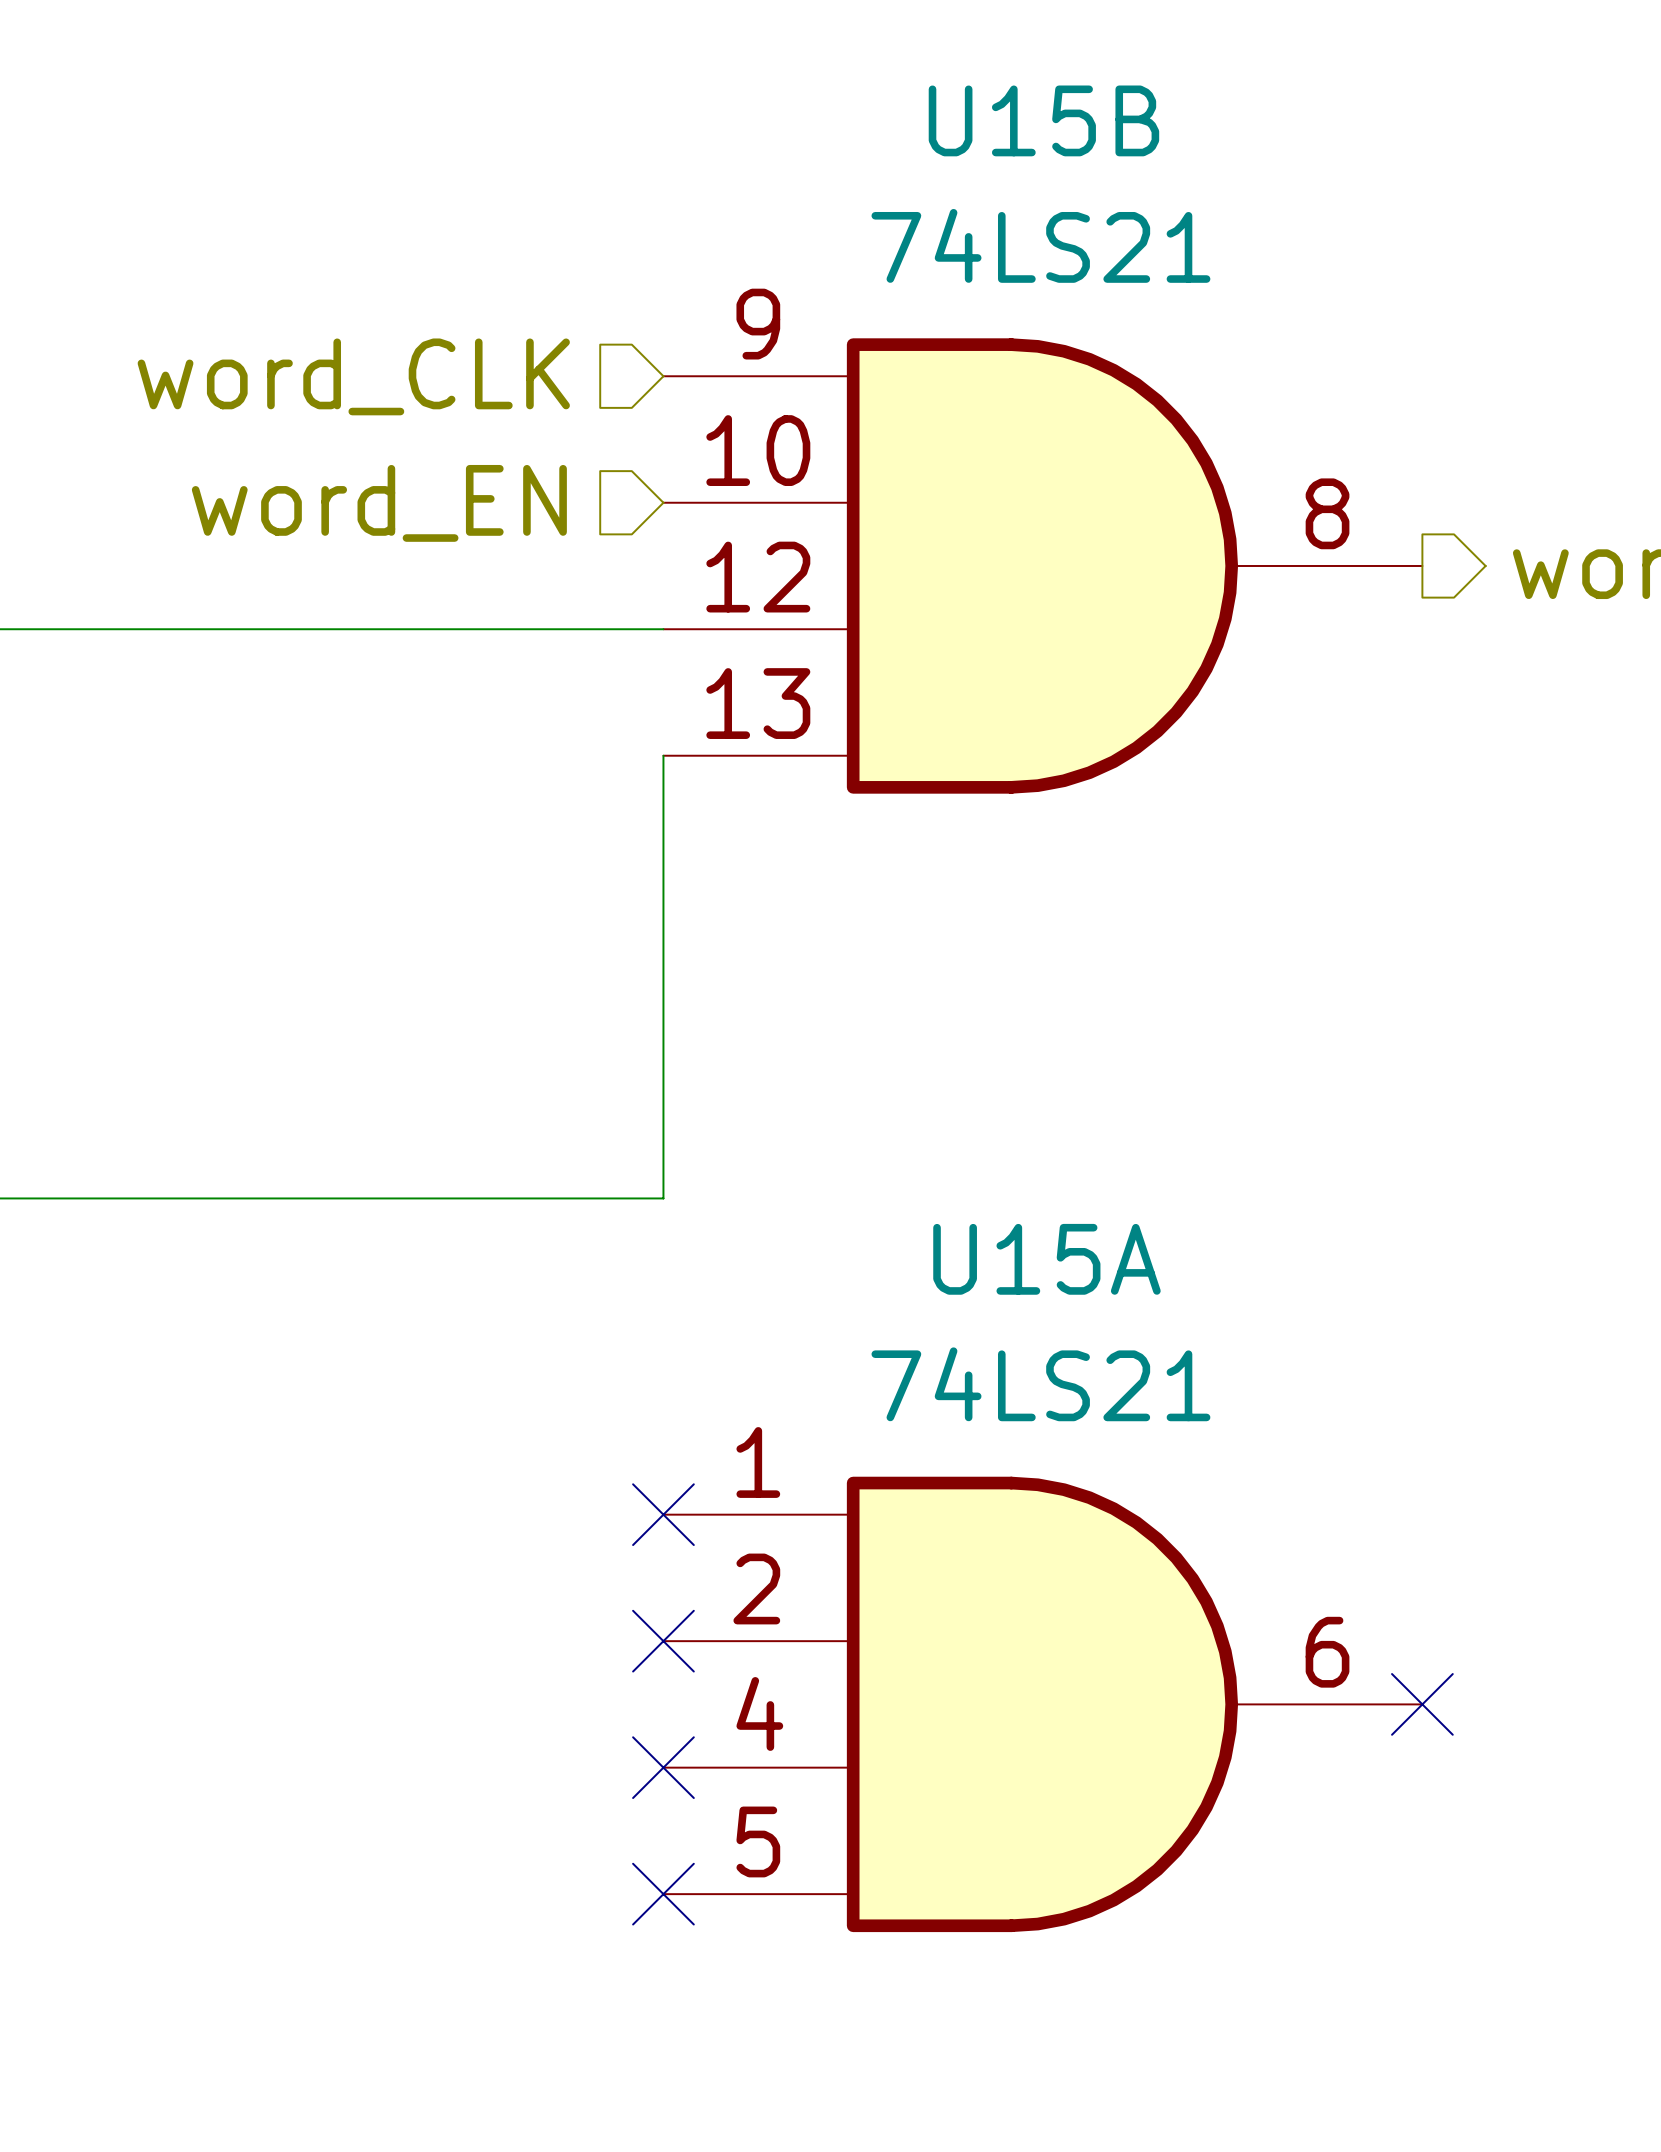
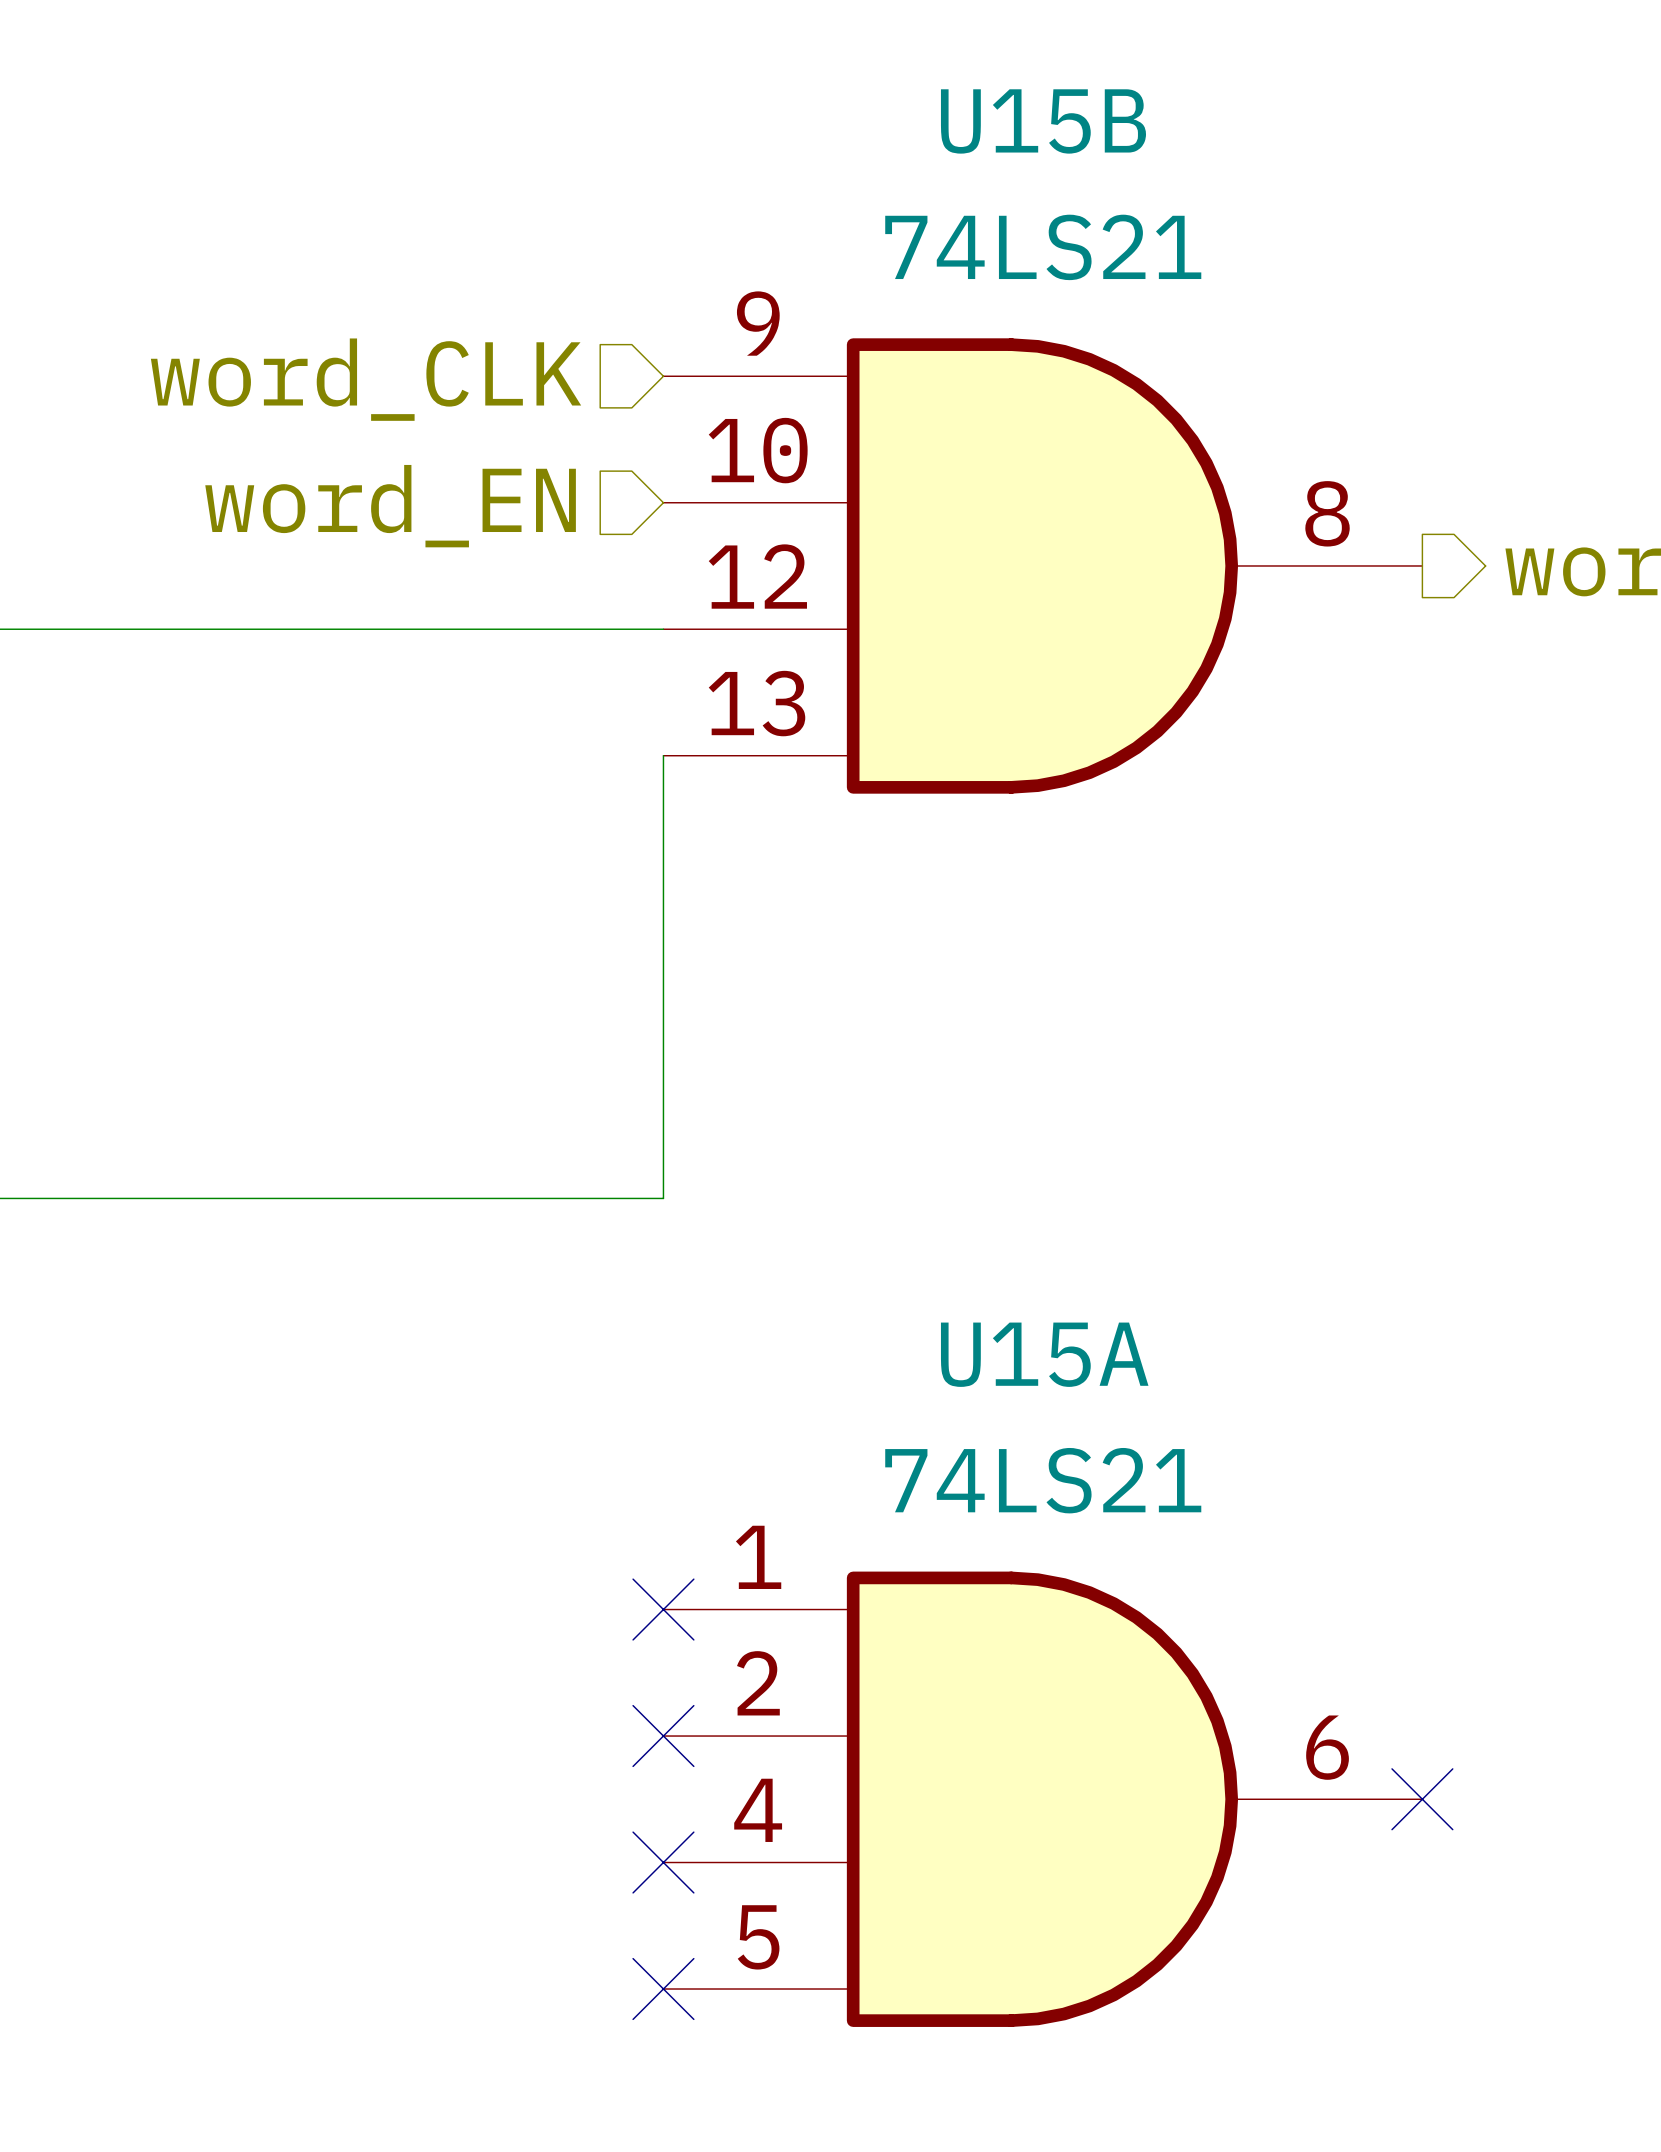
no-connect mark: (663, 1514) -> none
no-connect mark position: (663, 1641) -> (663, 1609)
U15A position: (1042, 1704) -> (1042, 1799)
no-connect mark position: (1422, 1704) -> (1422, 1799)
no-connect mark position: (663, 1767) -> (663, 1736)
no-connect mark position: (663, 1894) -> (663, 1862)
no-connect mark: none -> (663, 1989)

